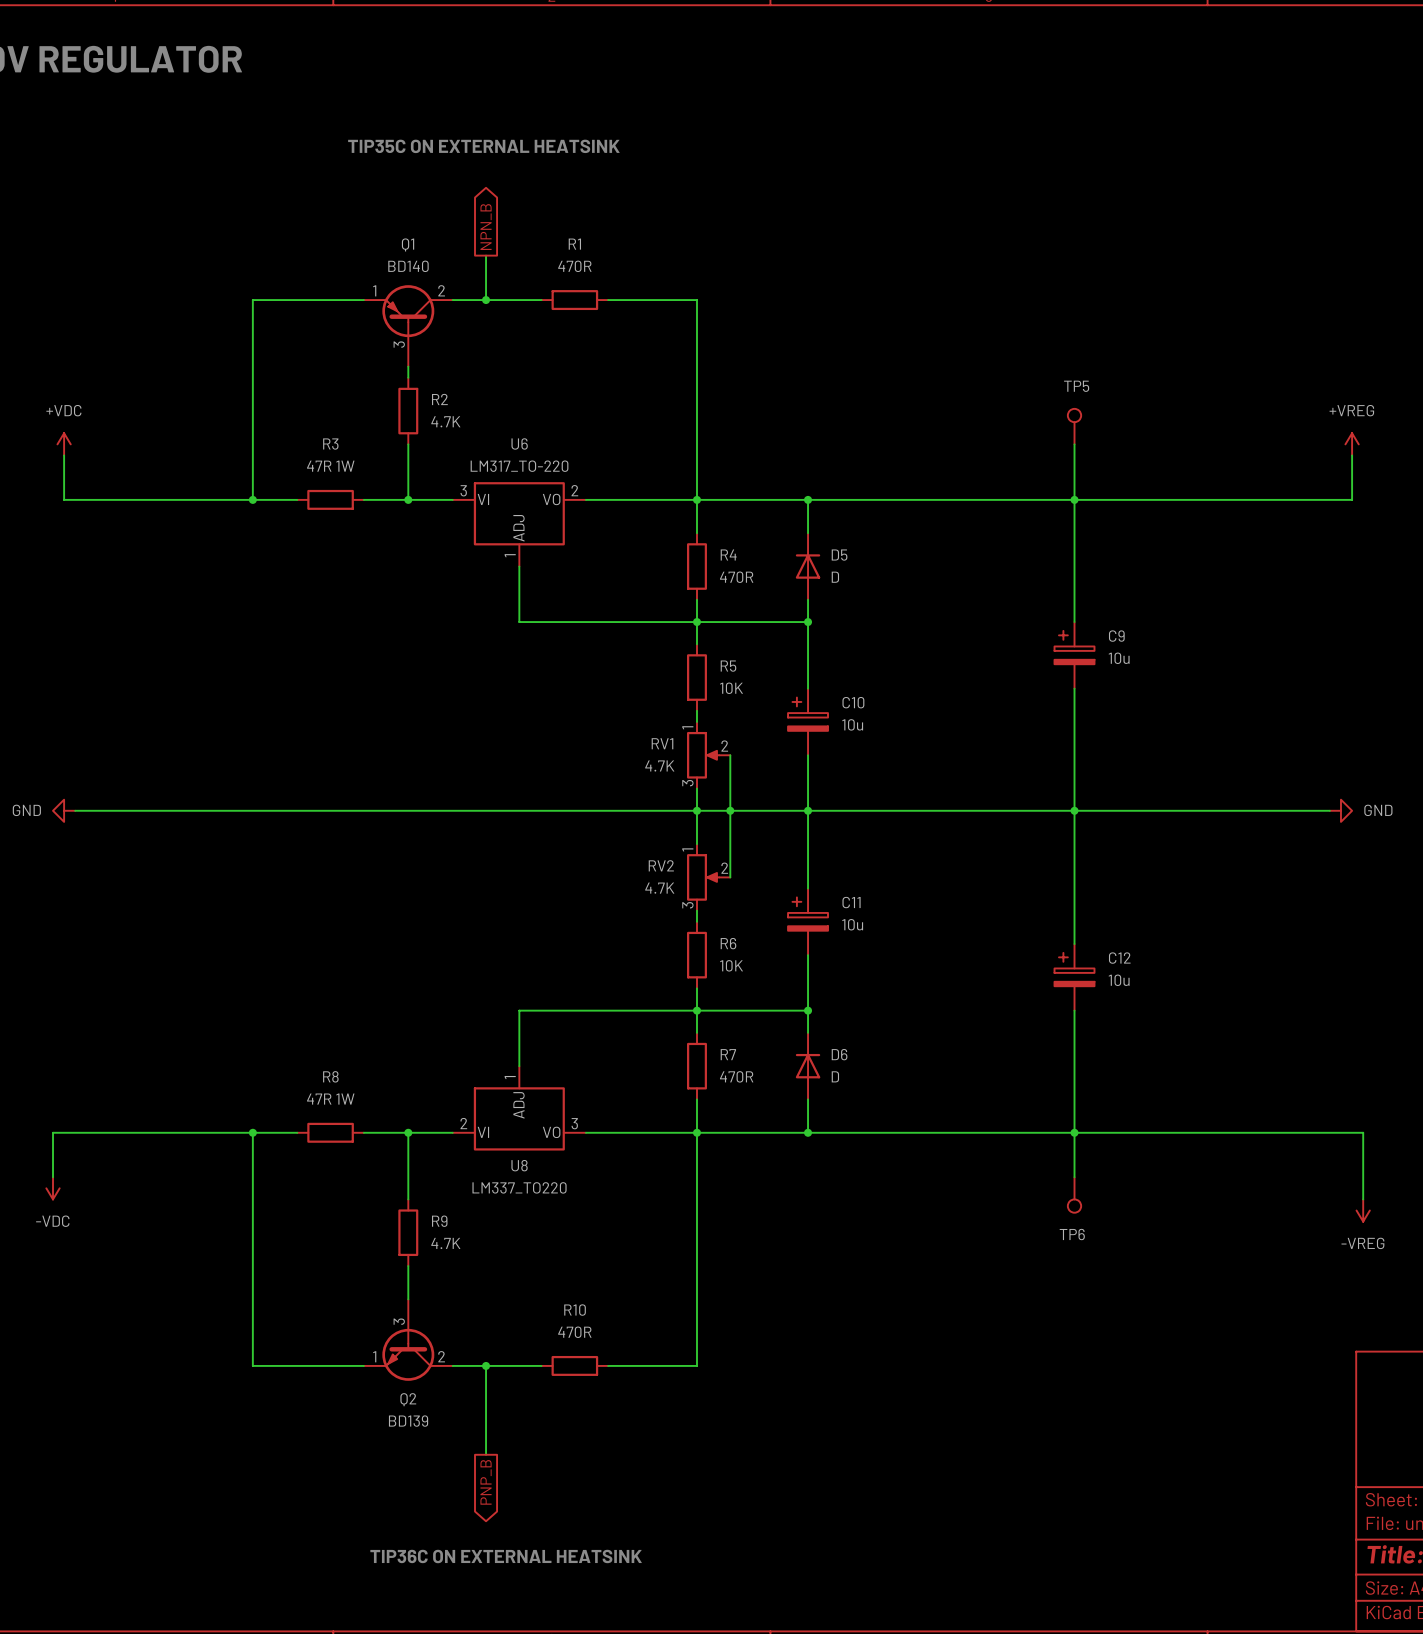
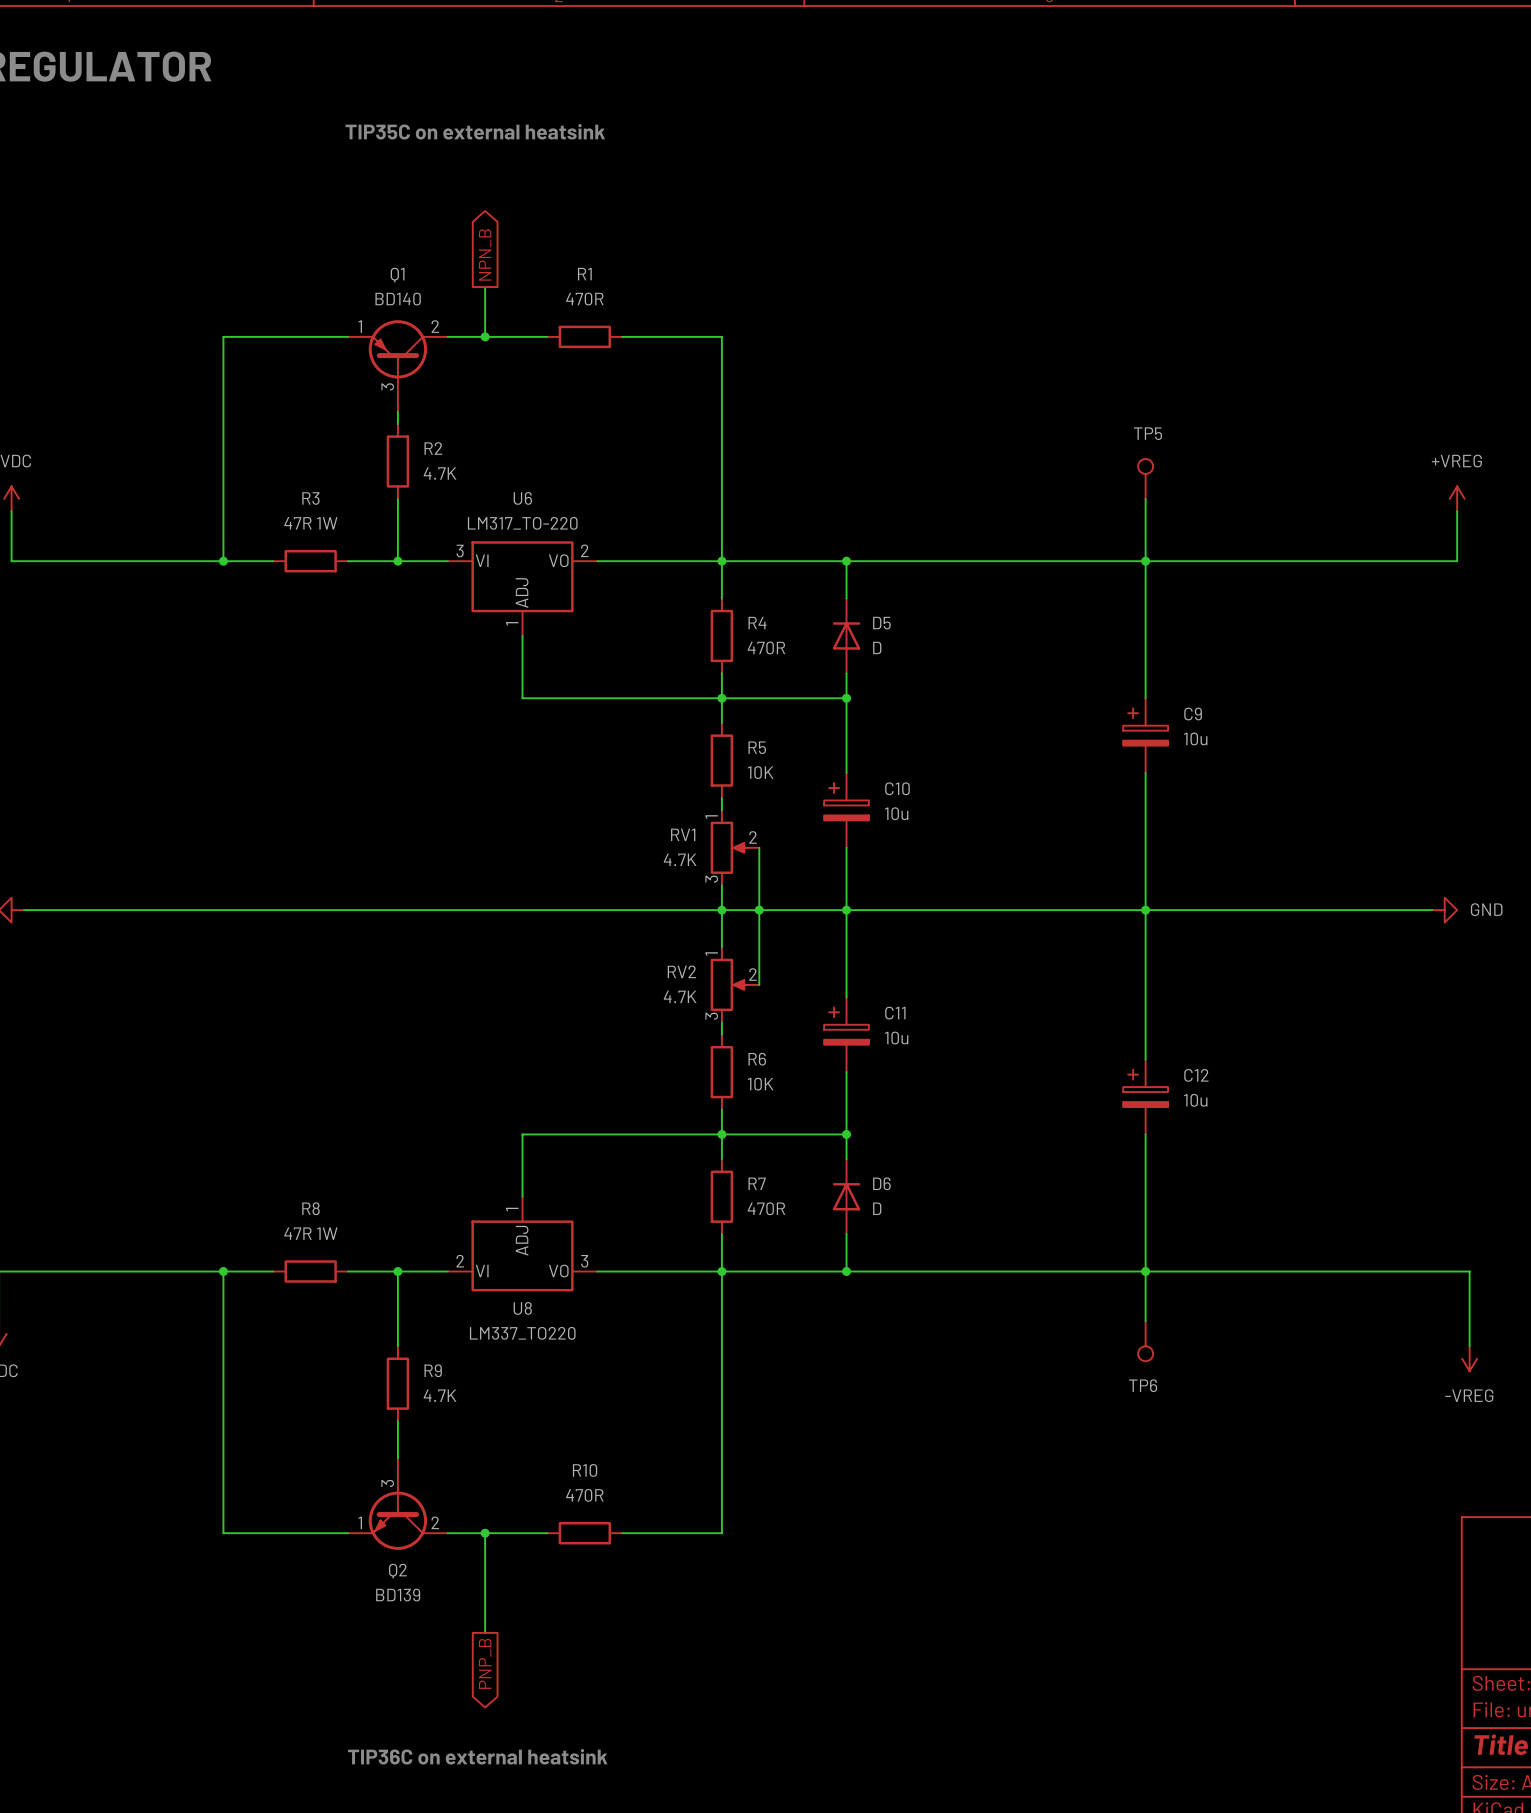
text: none -> TIP35C on external heatsink (475, 131)
text: TIP35C ON EXTERNAL HEATSINK (483, 146) -> none
text: TIP36C ON EXTERNAL HEATSINK (506, 1556) -> none
text: none -> TIP36C on external heatsink (477, 1756)

